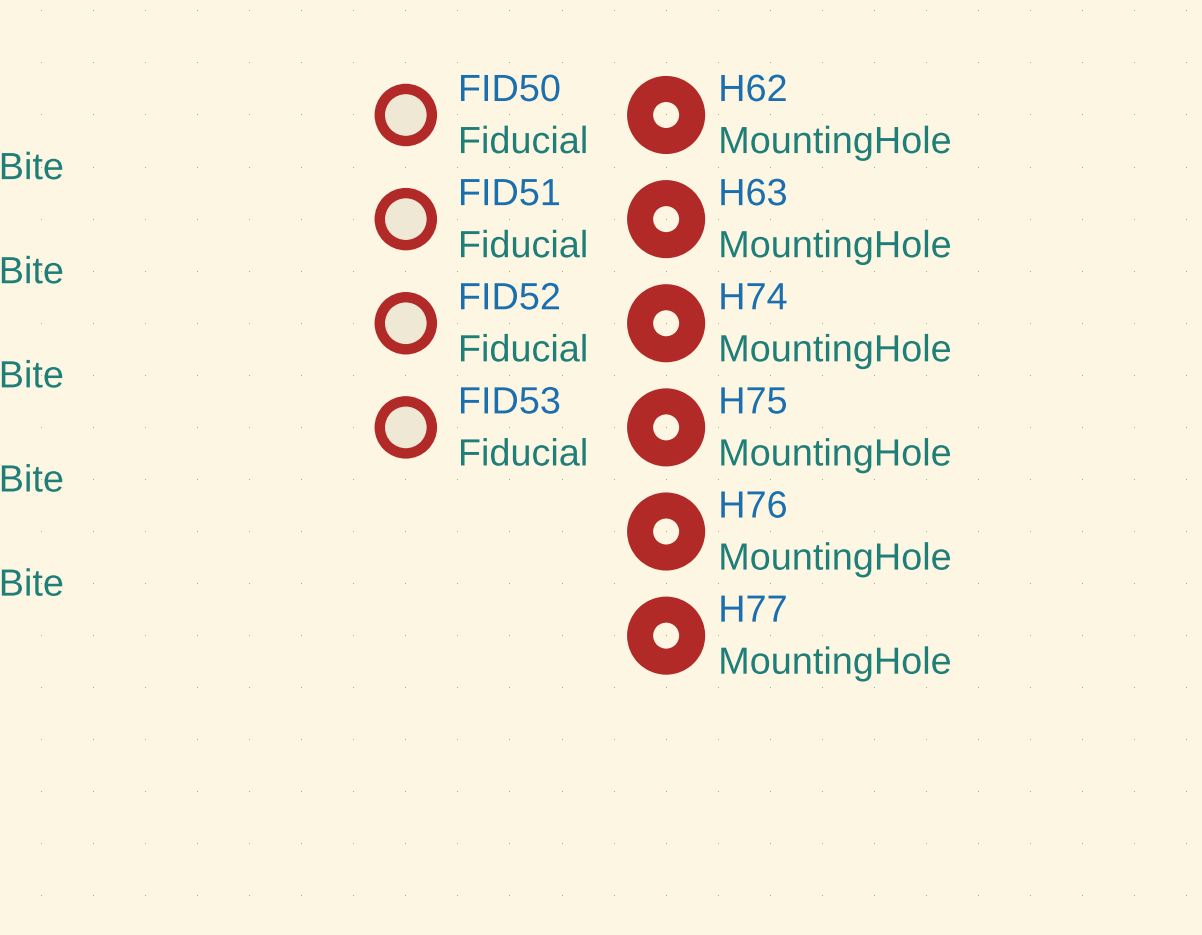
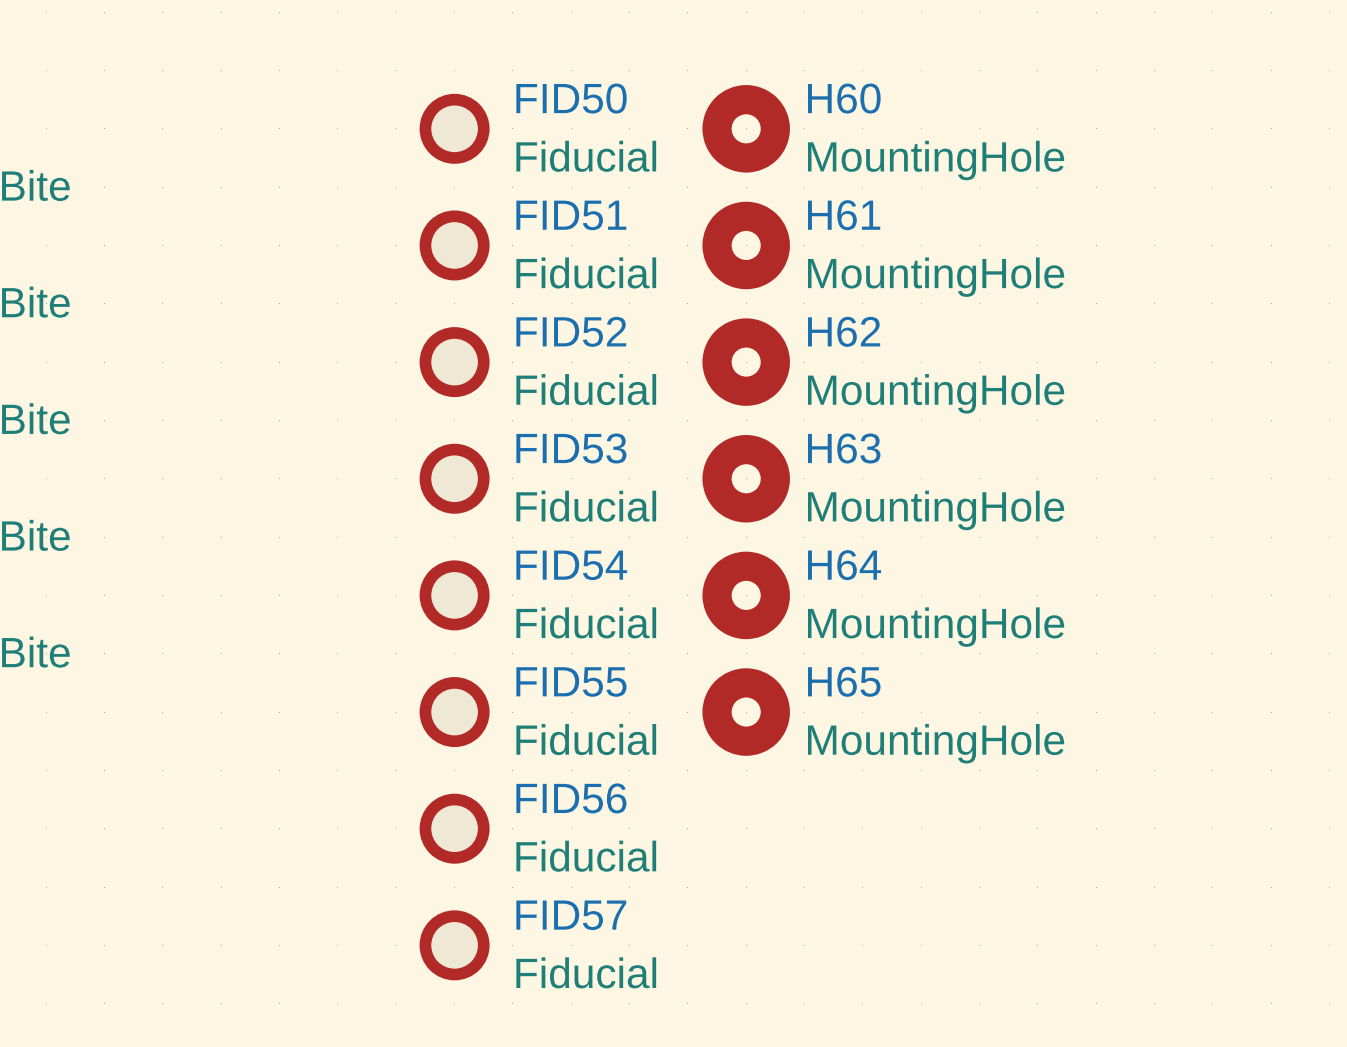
H62 name: H62 (753, 87) -> H60 (844, 98)
H63 name: H63 (753, 192) -> H61 (844, 215)
H74 name: H74 (753, 296) -> H62 (844, 331)
H75 name: H75 (753, 400) -> H63 (844, 448)
H76 name: H76 (753, 504) -> H64 (844, 565)
FID54: none -> Fiducial (454, 595)
H77 name: H77 (753, 608) -> H65 (844, 681)
FID55: none -> Fiducial (454, 712)
FID56: none -> Fiducial (454, 828)
FID57: none -> Fiducial (454, 945)

